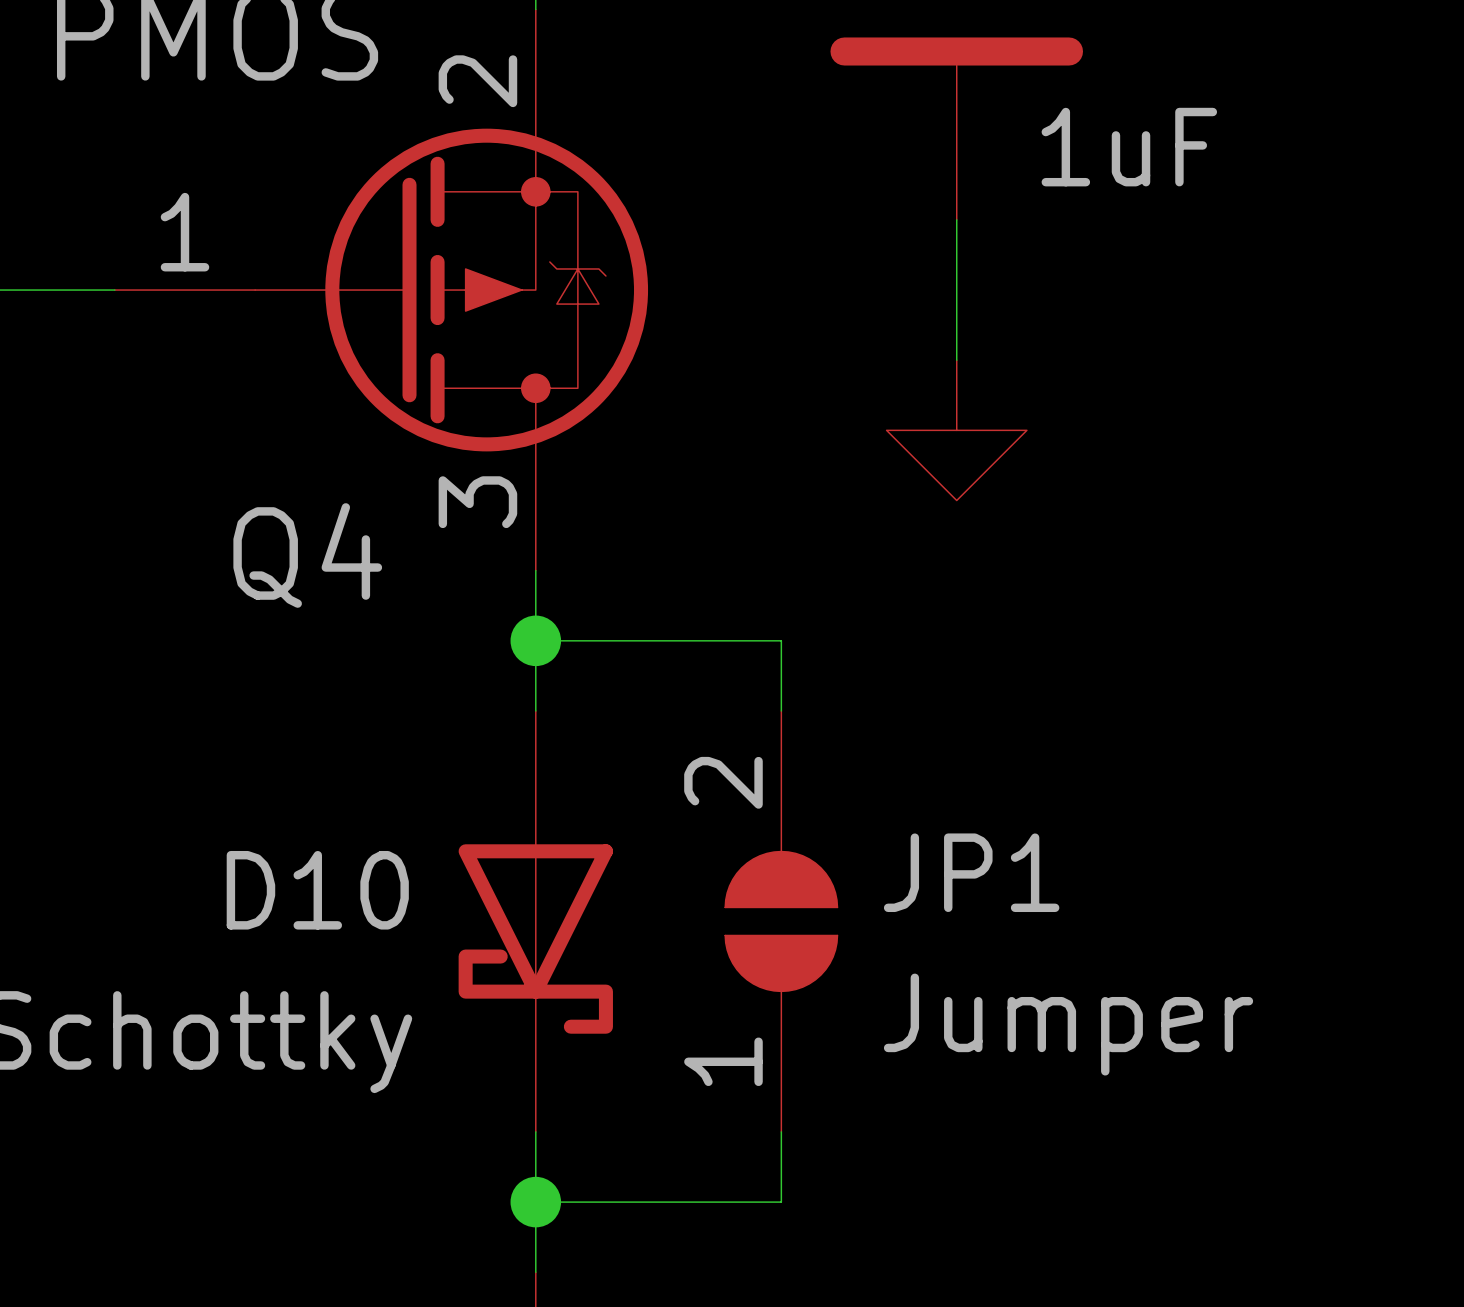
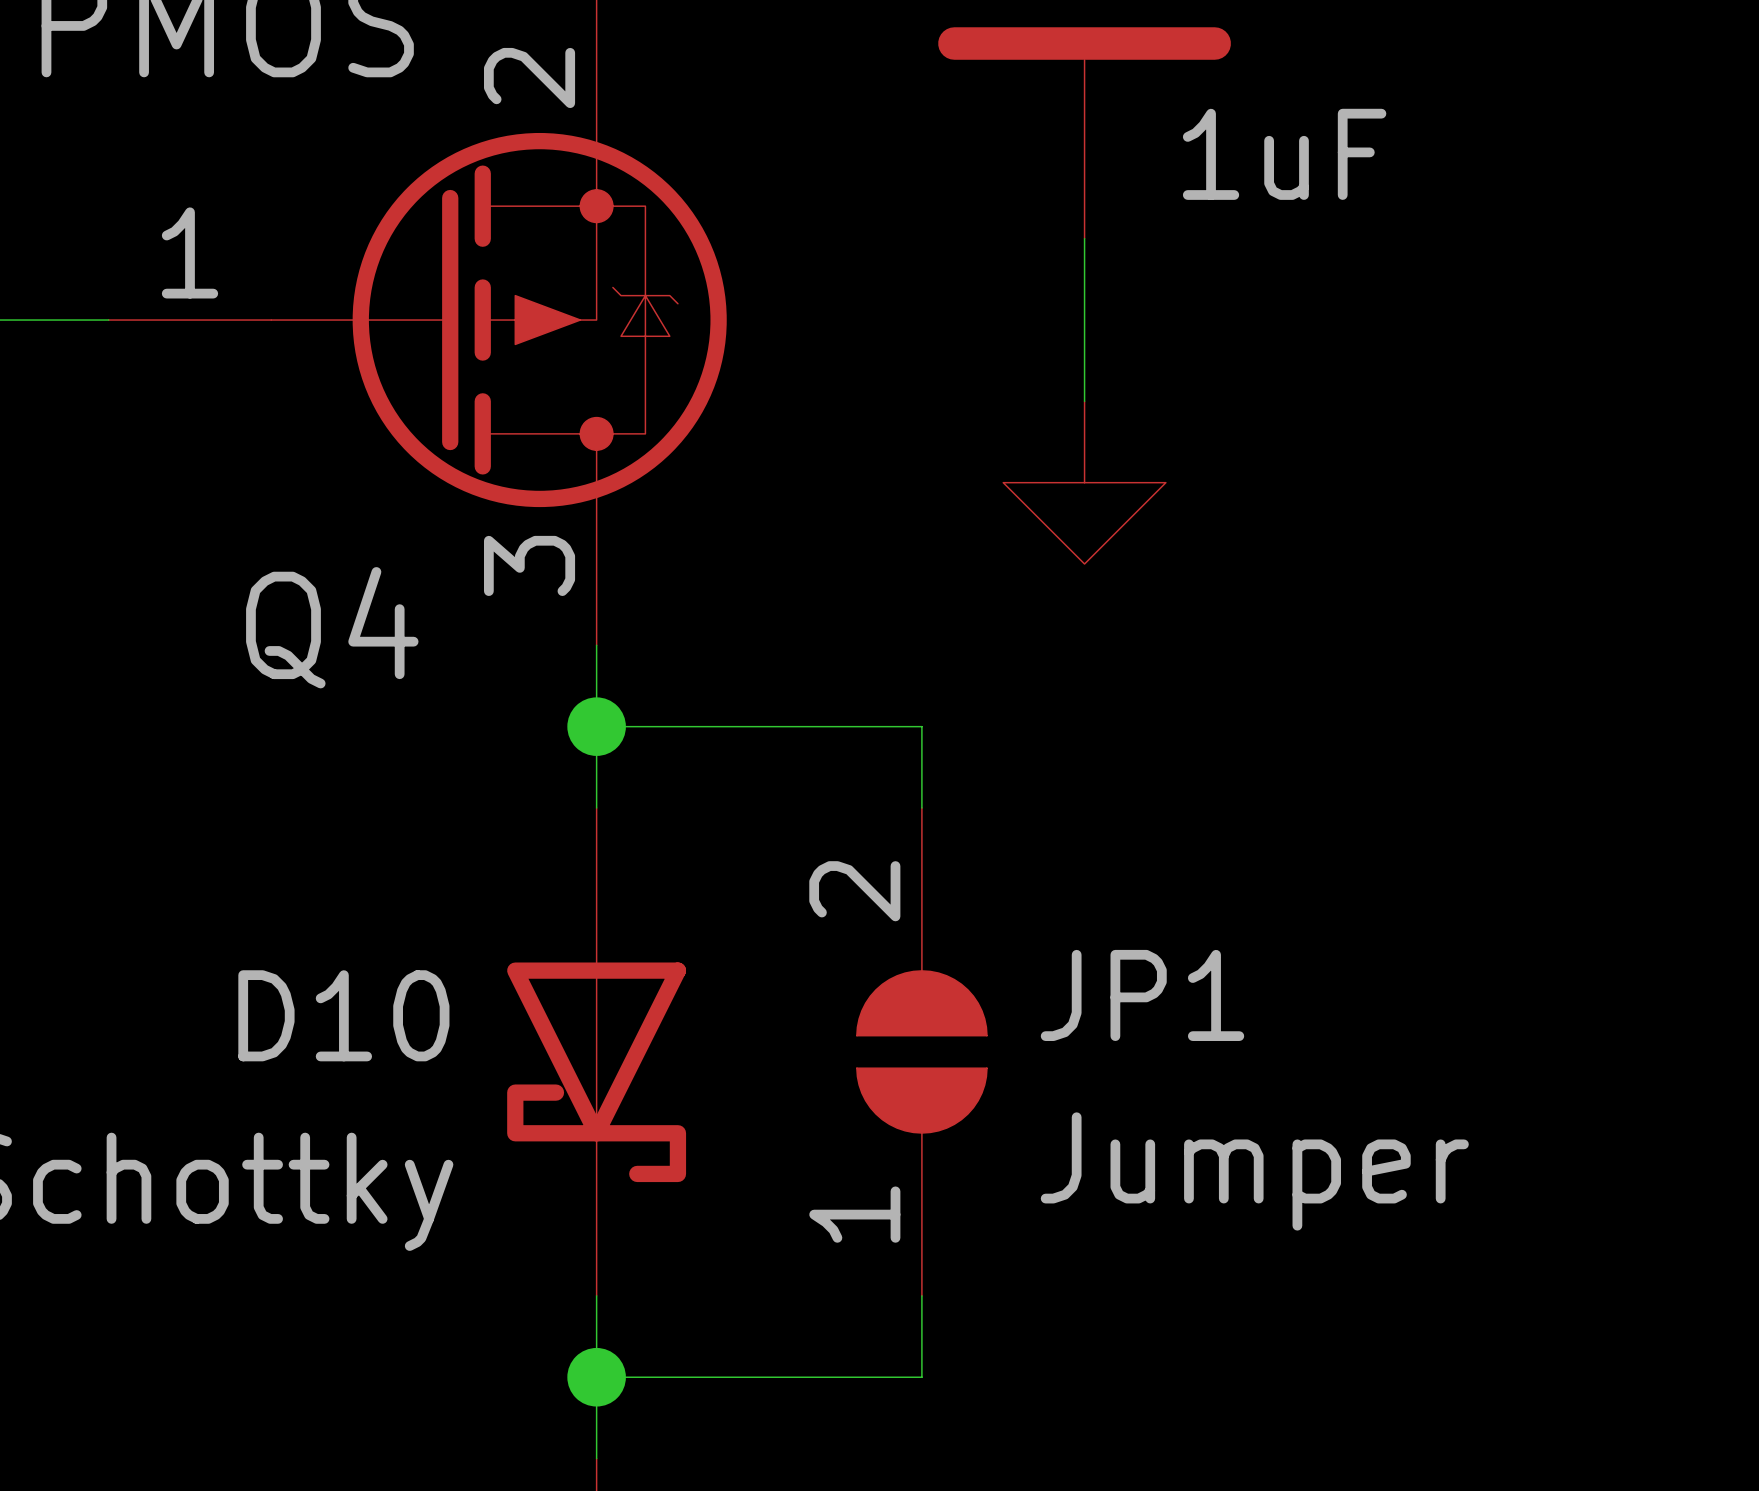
wire: (781, 640) (781, 710) -> (881, 726) (921, 726) (921, 807)
JP1 position: (781, 921) -> (921, 1051)
wire: (781, 1131) (781, 1202) -> (921, 1295) (921, 1377) (881, 1377)

